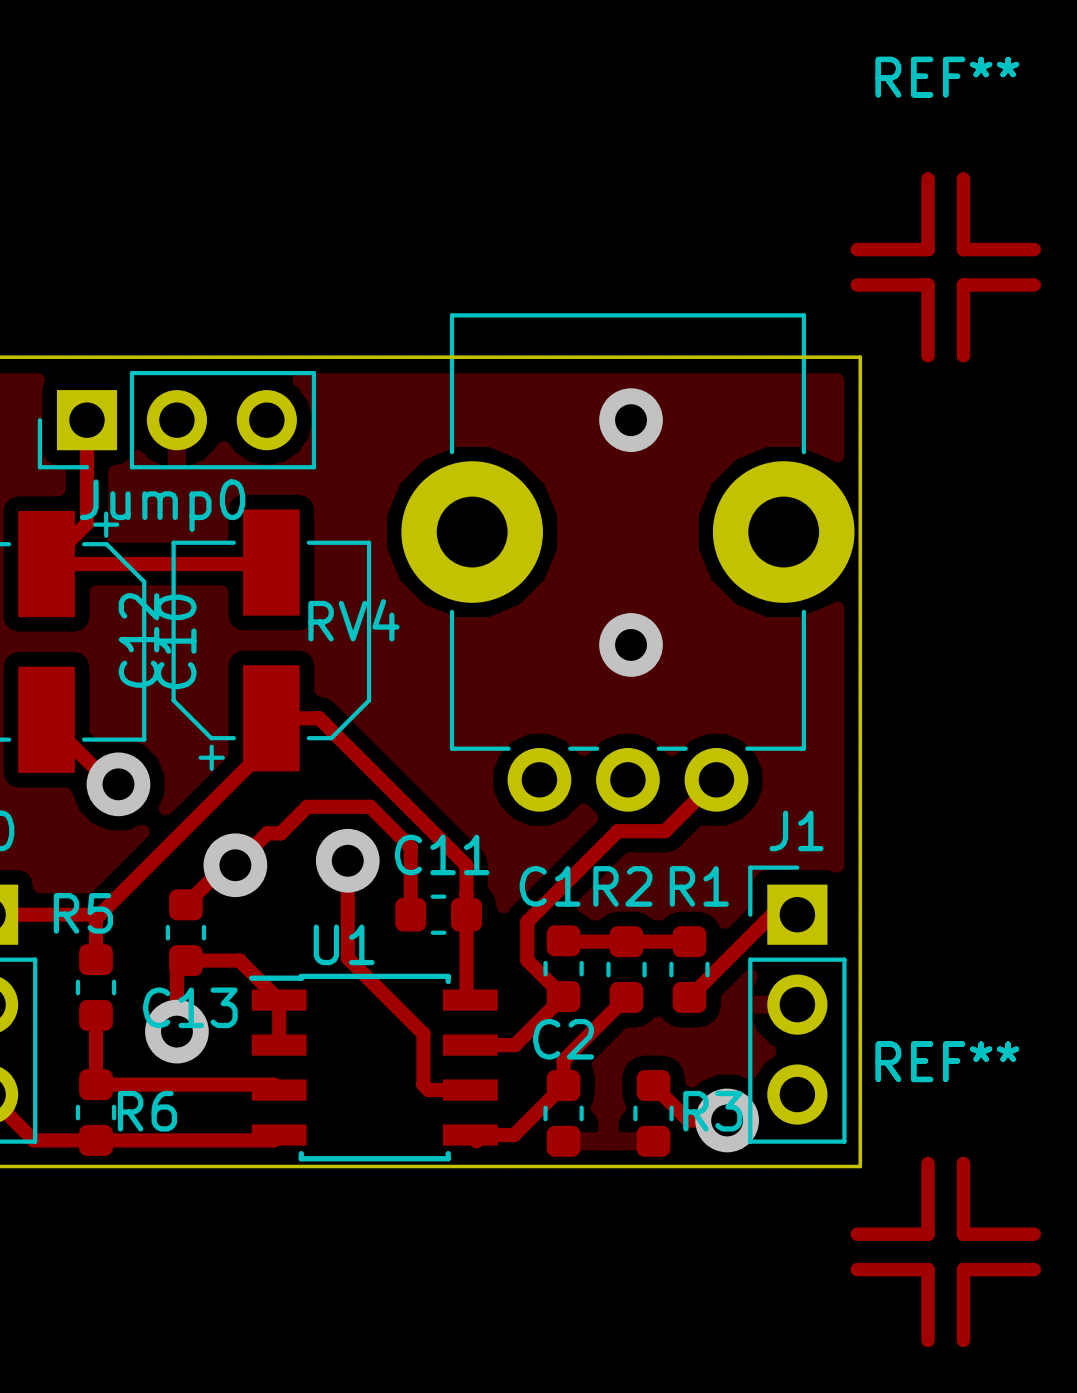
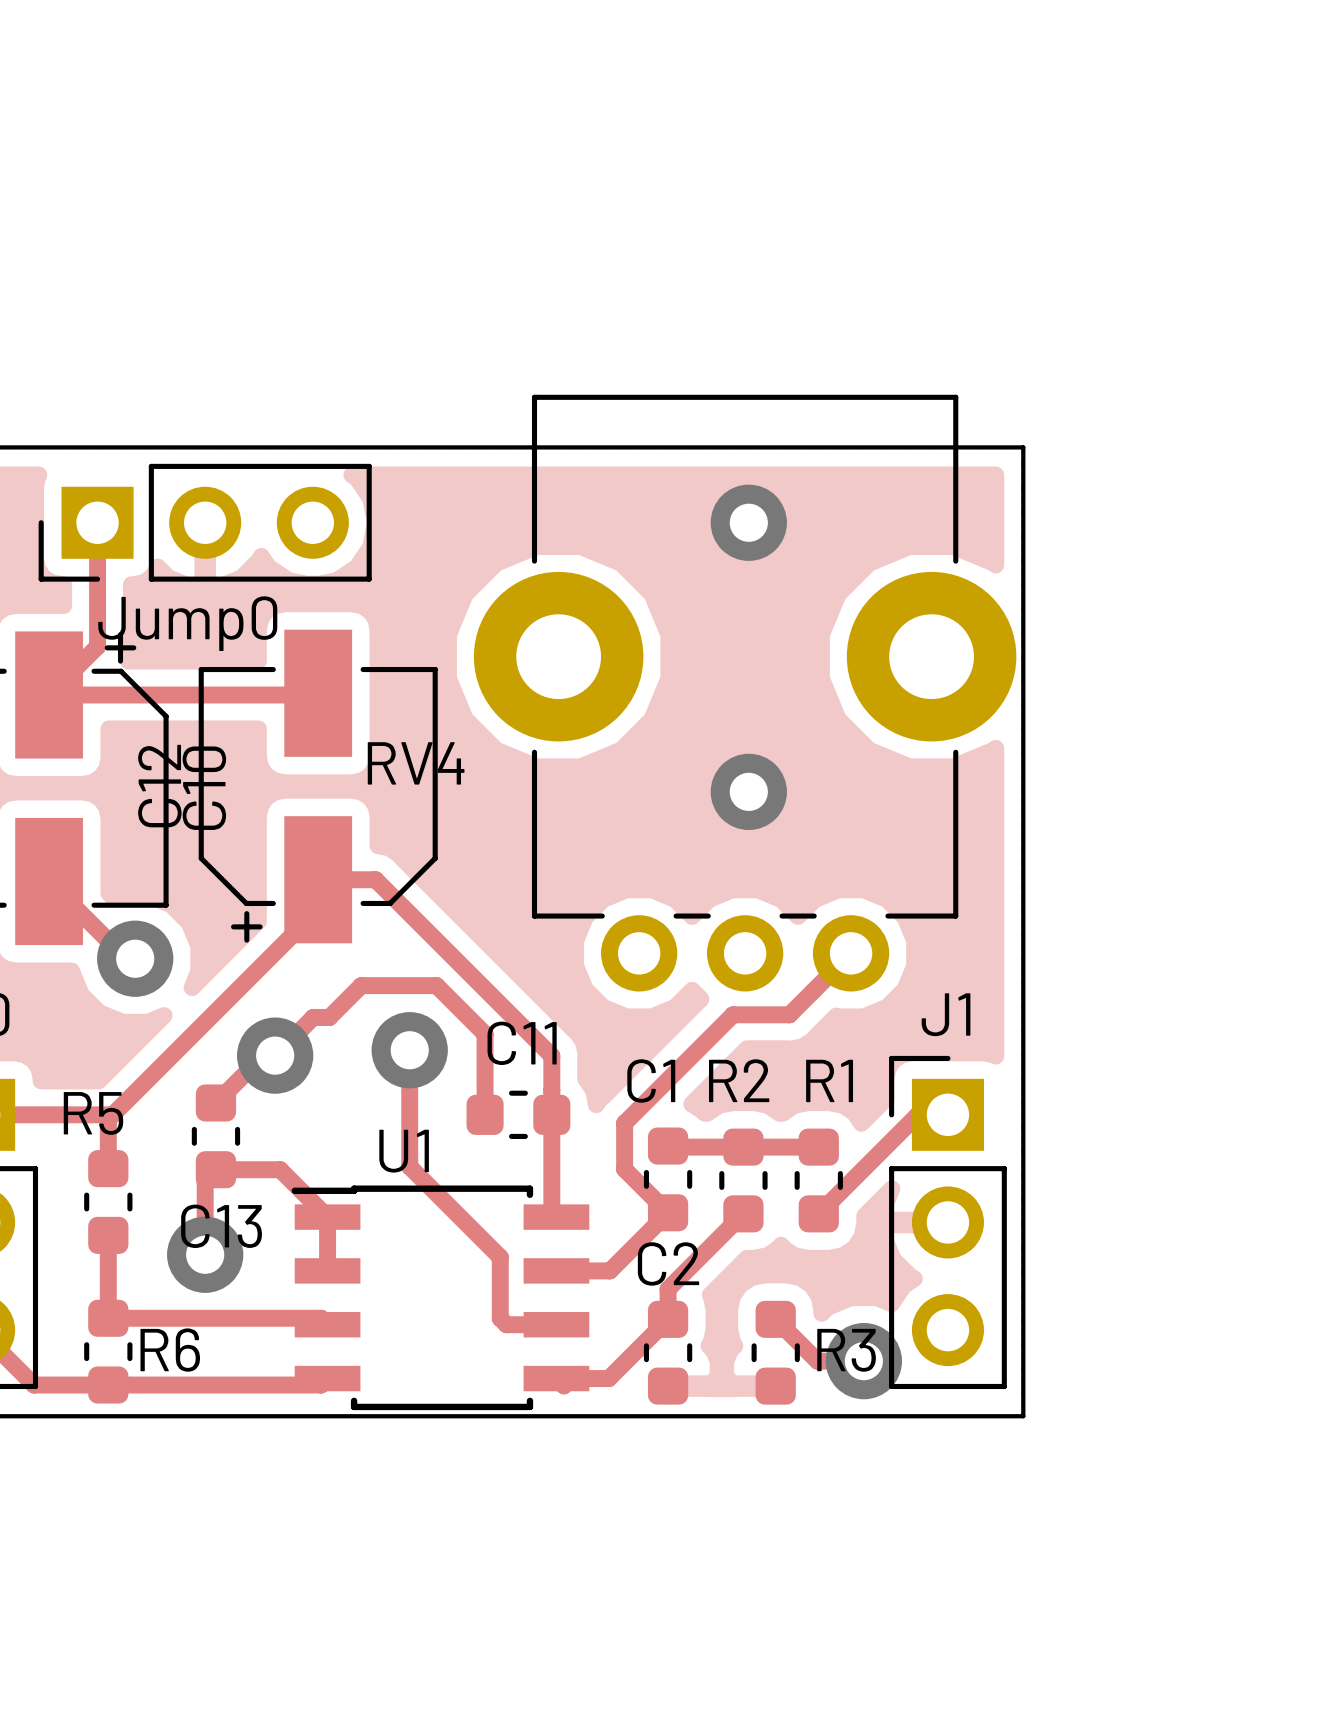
REF**: (947, 77) -> none
REF**: (945, 267) -> none
REF**: (947, 1061) -> none
REF**: (945, 1251) -> none

